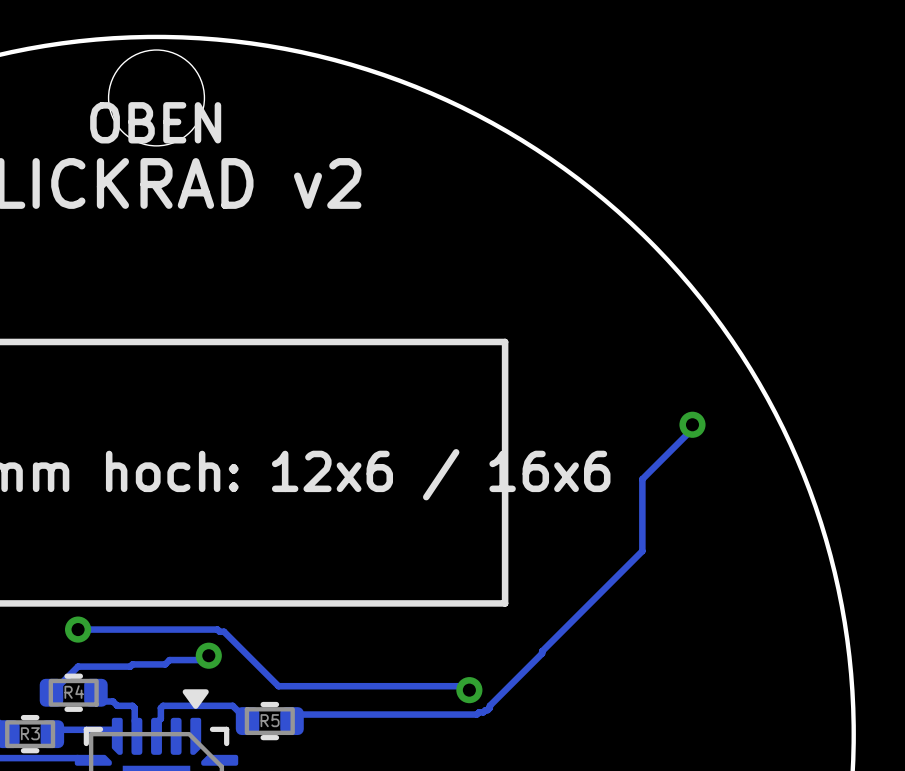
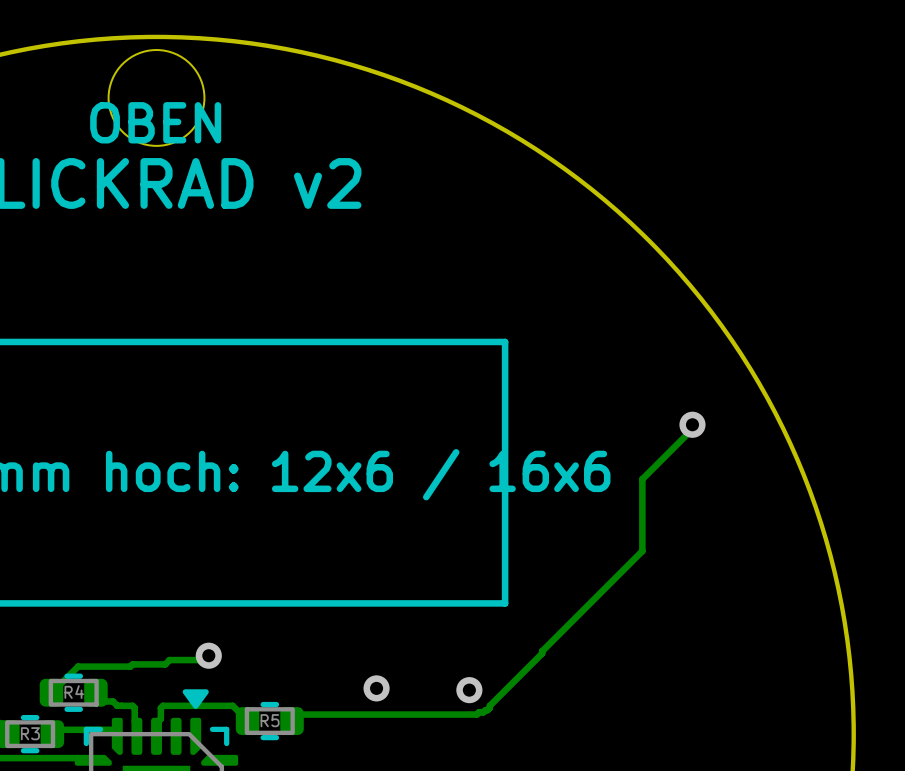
track: (78, 629) (217, 629) (224, 631) (278, 686) (459, 686) -> none
via: (78, 629) -> none
via: none -> (376, 688)

